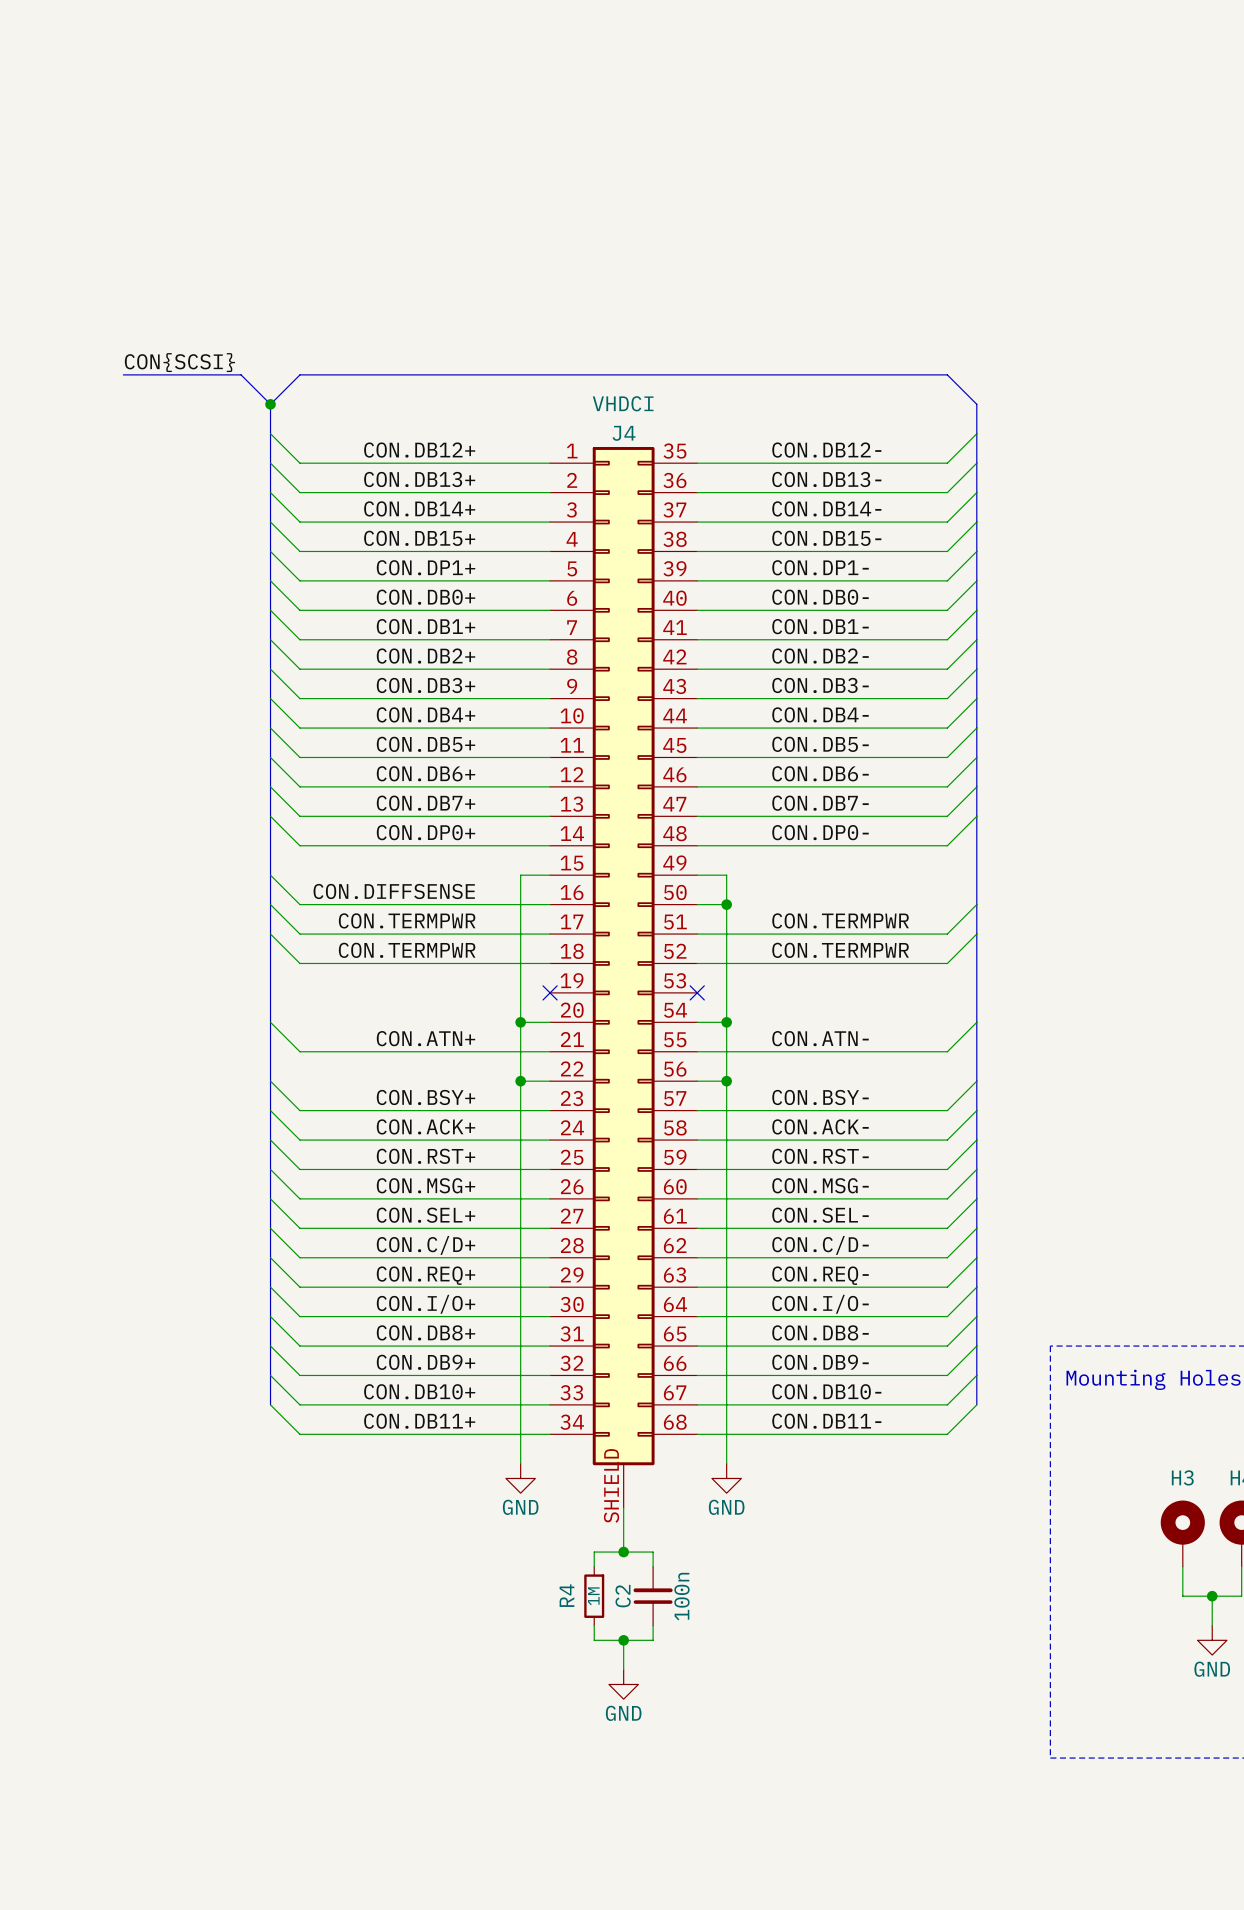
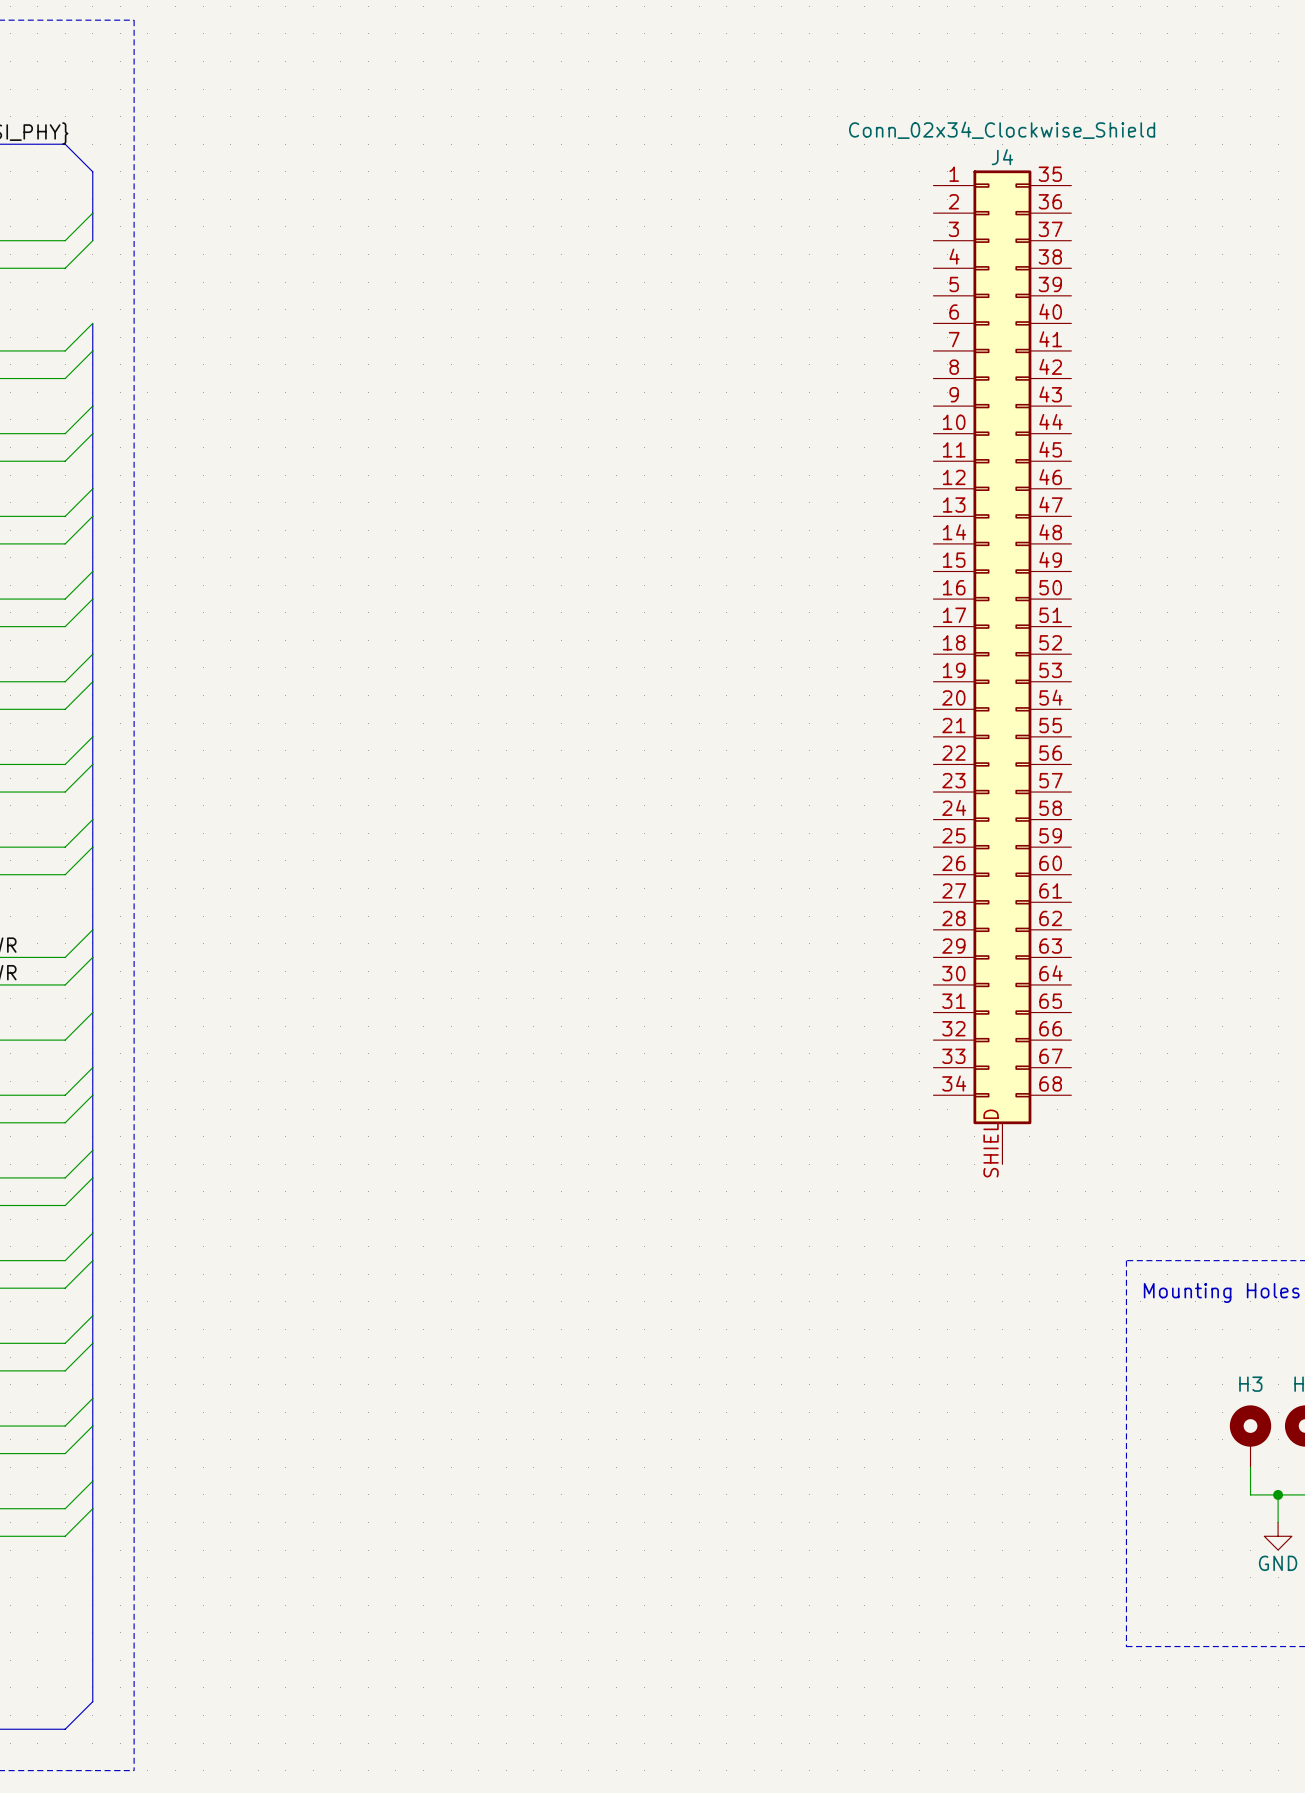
label: CON{SCSI} (179, 362) -> none
bus: (123, 374) (241, 374) (270, 404) -> none
J4 value: VHDCI (623, 403) -> Conn_02x34_Clockwise_Shield (1002, 130)
bus: (270, 404) (270, 1404) -> none
bus: (270, 404) (299, 374) (947, 374) (976, 404) (976, 1404) -> none
junction: (270, 404) -> none
wire: (270, 433) (299, 463) (550, 463) -> none
wire: (976, 433) (947, 463) (697, 463) -> none
label: CON.DB12+ (419, 450) -> none
label: CON.DB12- (826, 450) -> none
wire: (270, 463) (299, 492) (550, 492) -> none
wire: (976, 463) (947, 492) (697, 492) -> none
label: CON.DB13+ (419, 479) -> none
label: CON.DB13- (826, 479) -> none
wire: (270, 492) (299, 522) (550, 522) -> none
wire: (976, 492) (947, 522) (697, 522) -> none
label: CON.DB14+ (419, 508) -> none
label: CON.DB14- (826, 508) -> none
wire: (270, 522) (299, 551) (550, 551) -> none
wire: (976, 522) (947, 551) (697, 551) -> none
label: CON.DB15+ (419, 538) -> none
label: CON.DB15- (826, 538) -> none
wire: (270, 551) (299, 580) (550, 580) -> none
wire: (976, 551) (947, 580) (697, 580) -> none
label: CON.DP1+ (426, 567) -> none
label: CON.DP1- (820, 567) -> none
wire: (270, 580) (299, 610) (550, 610) -> none
wire: (976, 580) (947, 610) (697, 610) -> none
label: CON.DB0+ (426, 597) -> none
label: CON.DB0- (820, 597) -> none
wire: (270, 610) (299, 639) (550, 639) -> none
wire: (976, 610) (947, 639) (697, 639) -> none
label: CON.DB1+ (426, 626) -> none
label: CON.DB1- (820, 626) -> none
wire: (270, 639) (299, 669) (550, 669) -> none
wire: (976, 639) (947, 669) (697, 669) -> none
label: CON.DB2+ (426, 656) -> none
label: CON.DB2- (820, 656) -> none
wire: (270, 669) (299, 698) (550, 698) -> none
wire: (976, 669) (947, 698) (697, 698) -> none
label: CON.DB3+ (426, 685) -> none
label: CON.DB3- (820, 685) -> none
wire: (270, 698) (299, 728) (550, 728) -> none
wire: (976, 698) (947, 728) (697, 728) -> none
label: CON.DB4+ (426, 714) -> none
label: CON.DB4- (820, 714) -> none
wire: (270, 728) (299, 757) (550, 757) -> none
wire: (976, 728) (947, 757) (697, 757) -> none
label: CON.DB5+ (426, 744) -> none
label: CON.DB5- (820, 744) -> none
wire: (270, 757) (299, 786) (550, 786) -> none
wire: (976, 757) (947, 786) (697, 786) -> none
label: CON.DB6+ (426, 773) -> none
label: CON.DB6- (820, 773) -> none
wire: (270, 786) (299, 816) (550, 816) -> none
wire: (976, 786) (947, 816) (697, 816) -> none
label: CON.DB7+ (426, 803) -> none
label: CON.DB7- (820, 803) -> none
wire: (270, 816) (299, 845) (550, 845) -> none
wire: (976, 816) (947, 845) (697, 845) -> none
label: CON.DP0+ (426, 832) -> none
label: CON.DP0- (820, 832) -> none
wire: (270, 875) (299, 904) (550, 904) -> none
wire: (550, 875) (520, 875) (520, 1463) -> none
wire: (697, 875) (726, 875) (726, 1463) -> none
label: CON.DIFFSENSE (394, 891) -> none
wire: (270, 904) (299, 934) (550, 934) -> none
wire: (697, 904) (726, 904) -> none
junction: (726, 904) -> none
wire: (976, 904) (947, 934) (697, 934) -> none
label: CON.TERMPWR (407, 920) -> none
label: CON.TERMPWR (840, 920) -> none
wire: (270, 934) (299, 963) (550, 963) -> none
wire: (976, 934) (947, 963) (697, 963) -> none
label: CON.TERMPWR (407, 950) -> none
label: CON.TERMPWR (840, 950) -> none
J4 position: (623, 977) -> (1002, 667)
no-connect mark: (550, 992) -> none
no-connect mark: (697, 992) -> none
wire: (270, 1022) (299, 1051) (550, 1051) -> none
wire: (520, 1022) (550, 1022) -> none
junction: (520, 1022) -> none
wire: (697, 1022) (726, 1022) -> none
junction: (726, 1022) -> none
wire: (976, 1022) (947, 1051) (697, 1051) -> none
label: CON.ATN+ (426, 1038) -> none
label: CON.ATN- (820, 1038) -> none
wire: (270, 1081) (299, 1110) (550, 1110) -> none
wire: (520, 1081) (550, 1081) -> none
junction: (520, 1081) -> none
wire: (697, 1081) (726, 1081) -> none
junction: (726, 1081) -> none
wire: (976, 1081) (947, 1110) (697, 1110) -> none
label: CON.BSY+ (426, 1097) -> none
label: CON.BSY- (820, 1097) -> none
wire: (270, 1110) (299, 1140) (550, 1140) -> none
wire: (976, 1110) (947, 1140) (697, 1140) -> none
label: CON.ACK+ (426, 1126) -> none
label: CON.ACK- (820, 1126) -> none
wire: (270, 1140) (299, 1169) (550, 1169) -> none
wire: (976, 1140) (947, 1169) (697, 1169) -> none
label: CON.RST+ (426, 1156) -> none
label: CON.RST- (820, 1156) -> none
wire: (270, 1169) (299, 1198) (550, 1198) -> none
wire: (976, 1169) (947, 1198) (697, 1198) -> none
label: CON.MSG+ (426, 1185) -> none
label: CON.MSG- (820, 1185) -> none
wire: (270, 1198) (299, 1228) (550, 1228) -> none
wire: (976, 1198) (947, 1228) (697, 1228) -> none
label: CON.SEL+ (426, 1215) -> none
label: CON.SEL- (820, 1215) -> none
wire: (270, 1228) (299, 1257) (550, 1257) -> none
wire: (976, 1228) (947, 1257) (697, 1257) -> none
label: CON.C/D+ (426, 1245) -> none
label: CON.C/D- (820, 1245) -> none
wire: (270, 1257) (299, 1287) (550, 1287) -> none
wire: (976, 1257) (947, 1287) (697, 1287) -> none
label: CON.REQ+ (426, 1275) -> none
label: CON.REQ- (820, 1275) -> none
wire: (270, 1287) (299, 1316) (550, 1316) -> none
wire: (976, 1287) (947, 1316) (697, 1316) -> none
label: CON.I/O+ (426, 1304) -> none
label: CON.I/O- (820, 1304) -> none
wire: (270, 1316) (299, 1346) (550, 1346) -> none
wire: (976, 1316) (947, 1346) (697, 1346) -> none
label: CON.DB8+ (426, 1332) -> none
label: CON.DB8- (820, 1332) -> none
wire: (270, 1346) (299, 1375) (550, 1375) -> none
wire: (976, 1346) (947, 1375) (697, 1375) -> none
label: CON.DB9+ (426, 1362) -> none
label: CON.DB9- (820, 1362) -> none
wire: (270, 1375) (299, 1404) (550, 1404) -> none
wire: (976, 1375) (947, 1404) (697, 1404) -> none
label: CON.DB10+ (419, 1391) -> none
label: CON.DB10- (826, 1391) -> none
wire: (270, 1404) (299, 1434) (550, 1434) -> none
wire: (976, 1404) (947, 1434) (697, 1434) -> none
label: CON.DB11+ (419, 1421) -> none
label: CON.DB11- (826, 1421) -> none
power symbol: GND (520, 1478) -> none
power symbol: GND (726, 1478) -> none
wire: (623, 1507) (623, 1552) -> none
junction: (623, 1552) -> none
wire: (594, 1566) (594, 1552) (653, 1552) (653, 1566) -> none
R4: 1M (594, 1596) -> none
C2: 100n (653, 1596) -> none
wire: (594, 1625) (594, 1640) (653, 1640) (653, 1625) -> none
wire: (623, 1640) (623, 1669) -> none
junction: (623, 1640) -> none
power symbol: GND (623, 1684) -> none

